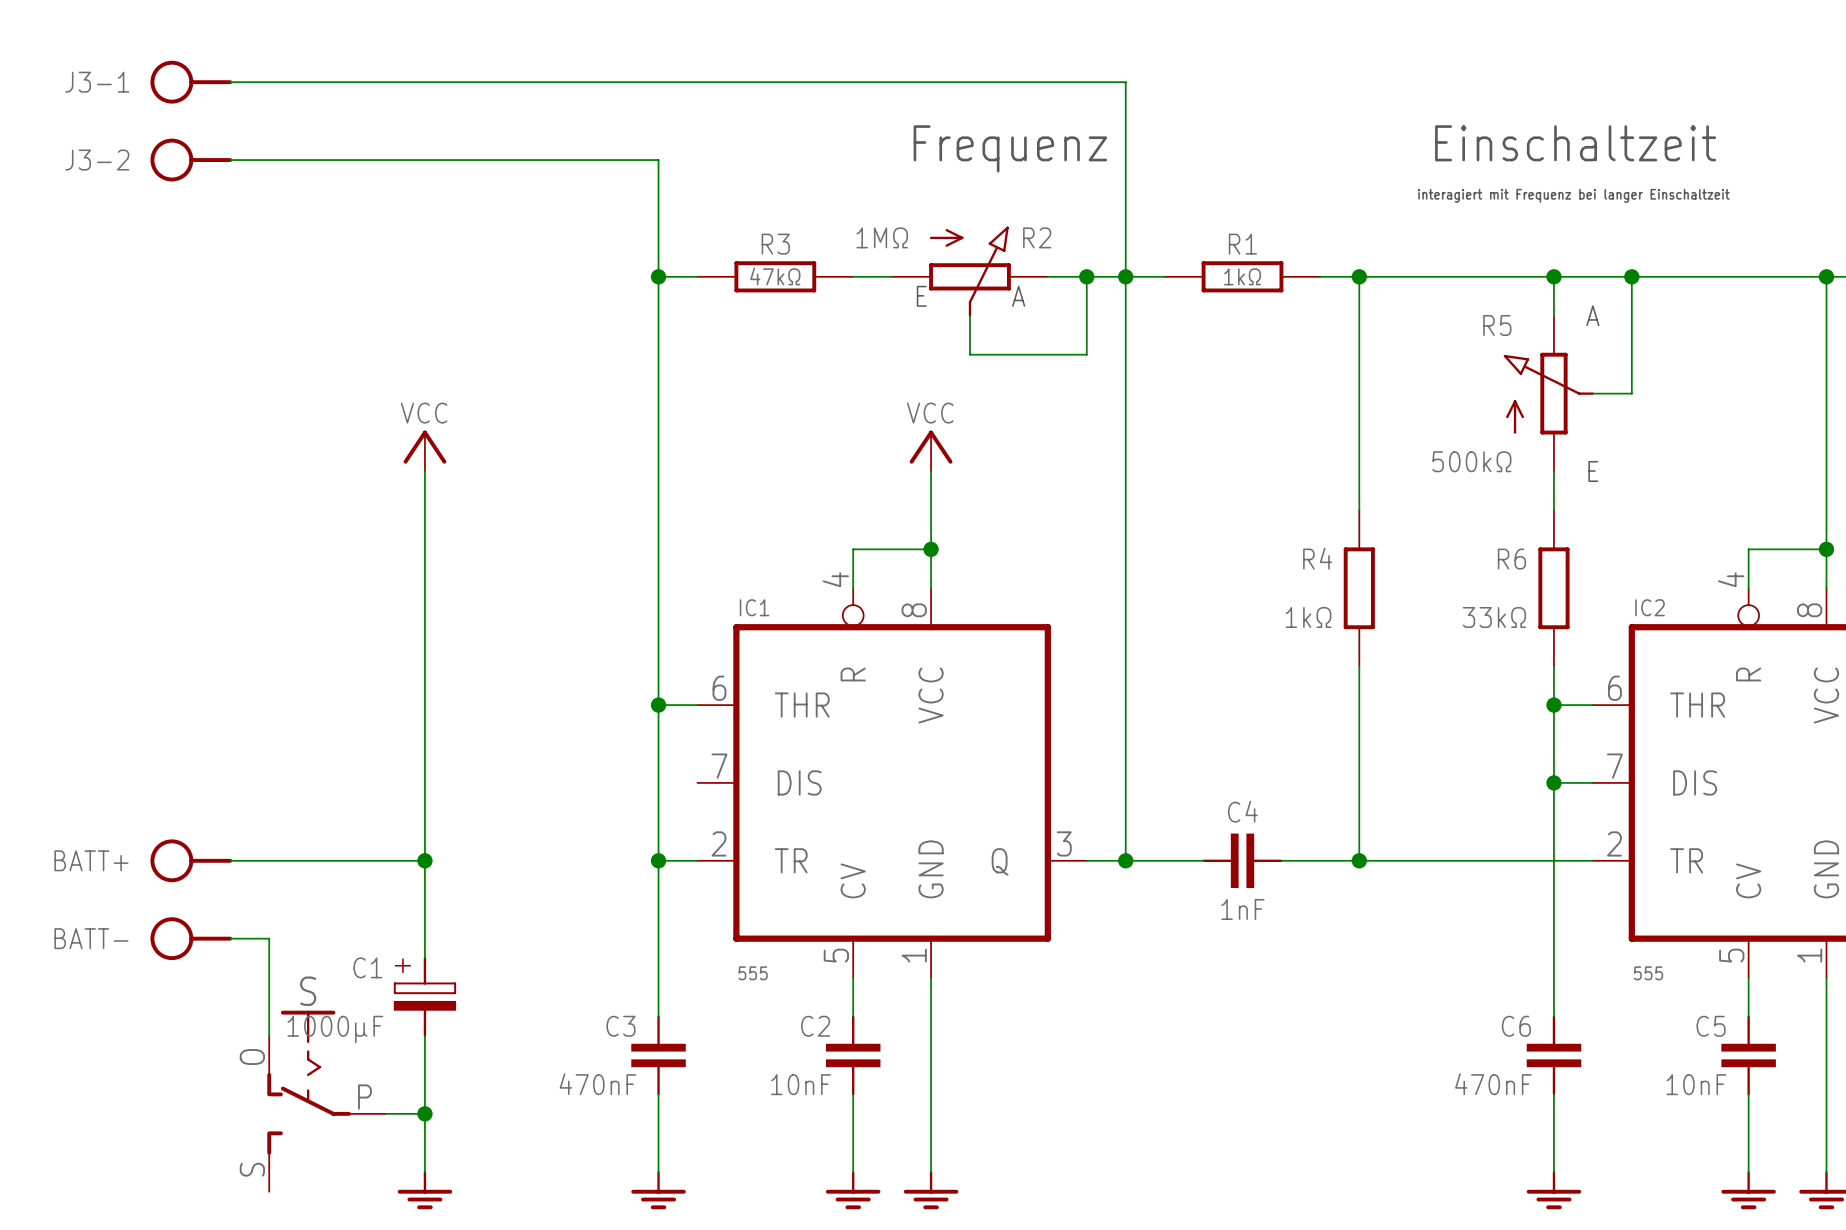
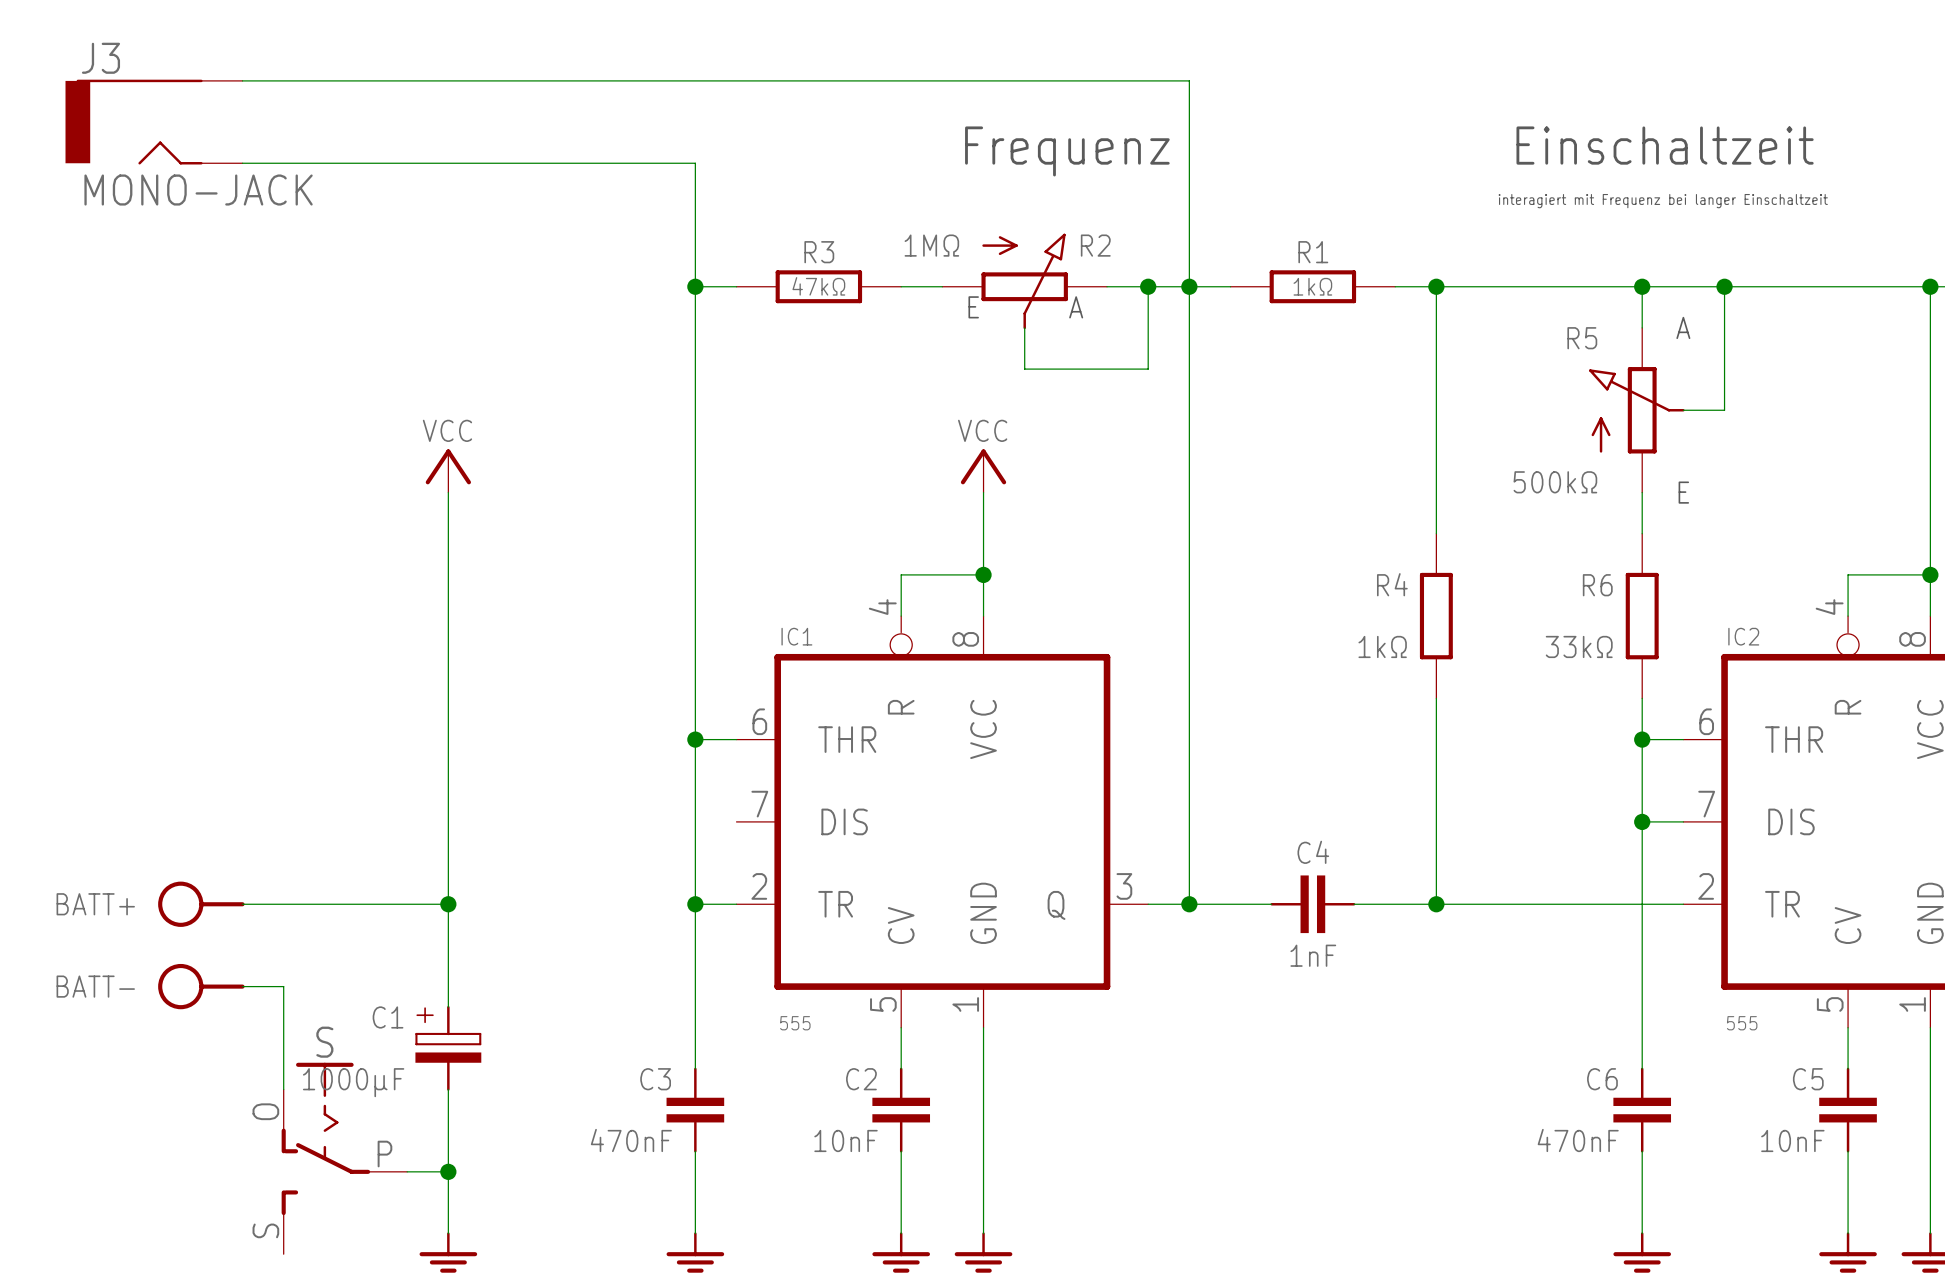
J3-1: (191, 82) -> none
J3: none -> MONO-JACK (154, 122)
J3-2: (191, 160) -> none

